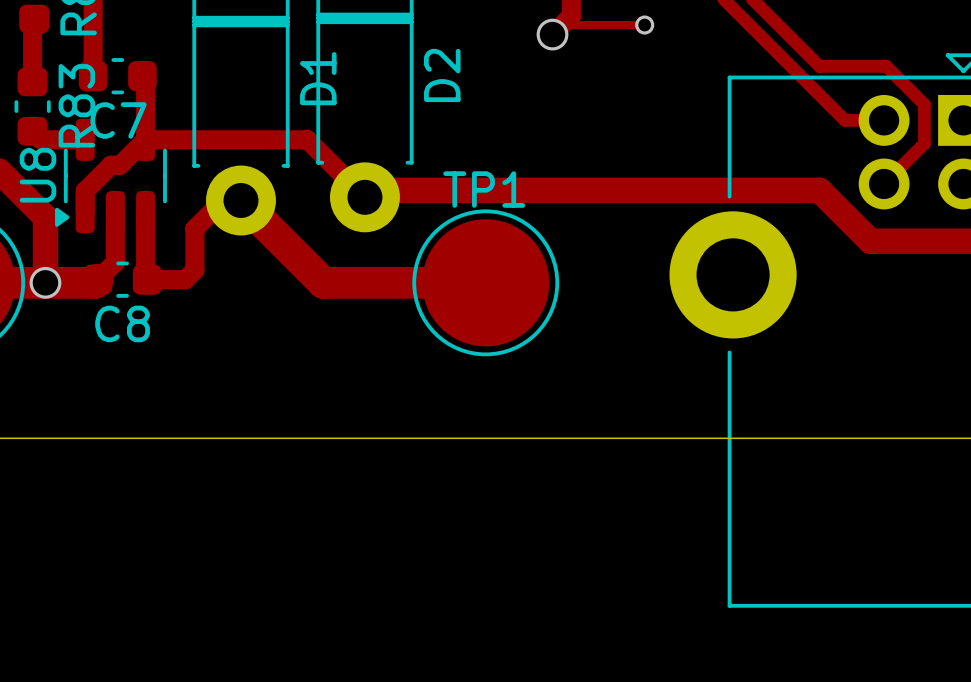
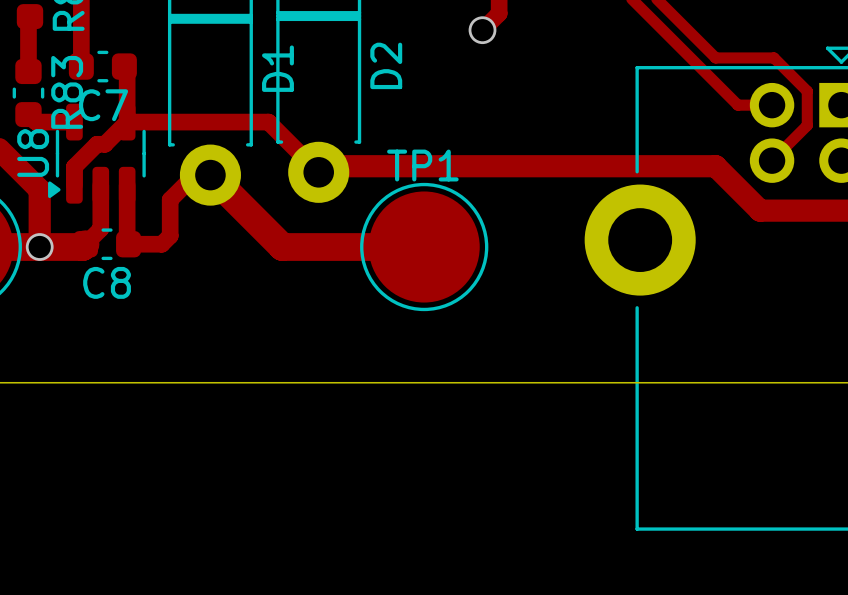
track: (644, 25) (562, 25) (552, 34) -> none
via: (644, 25) -> none

